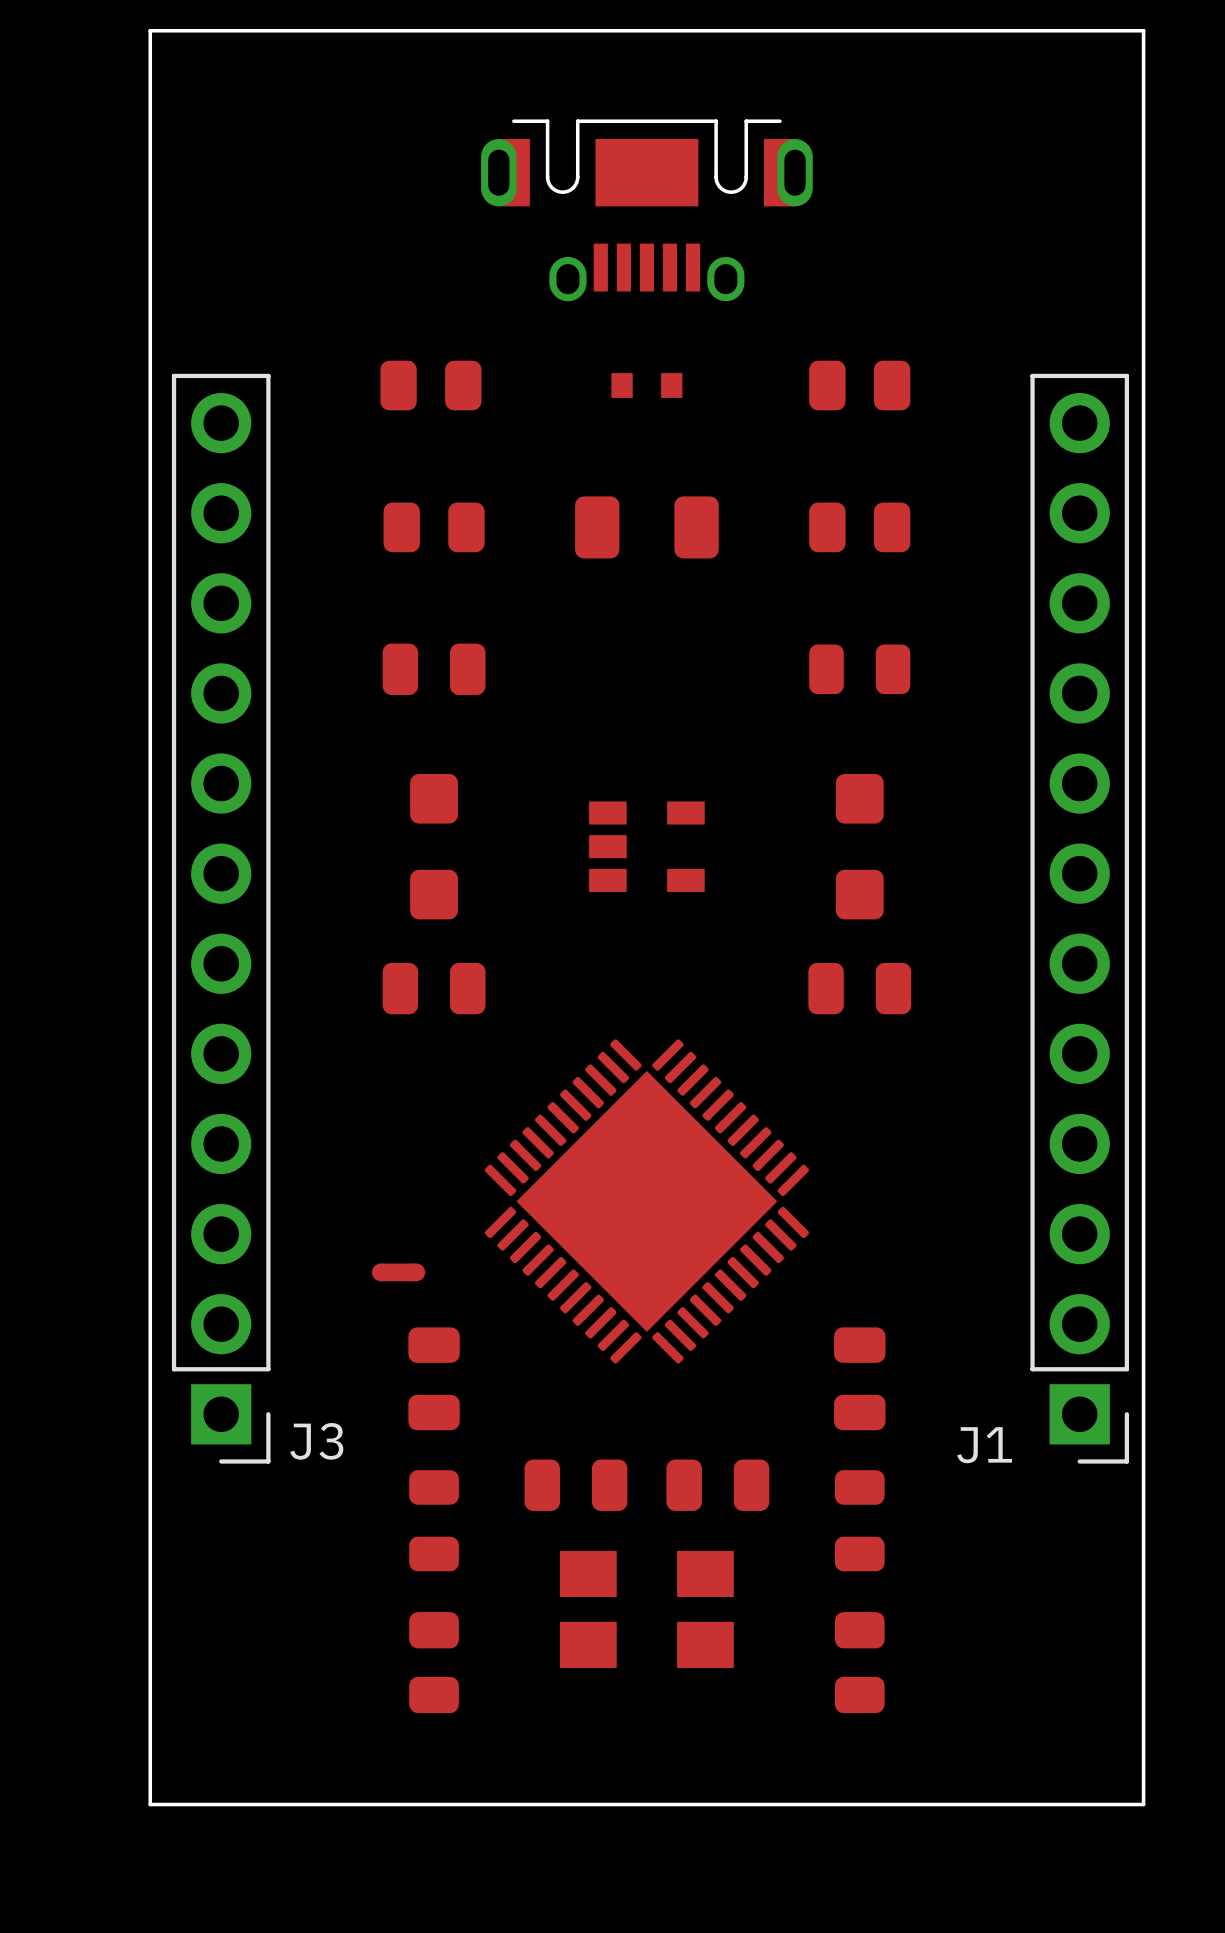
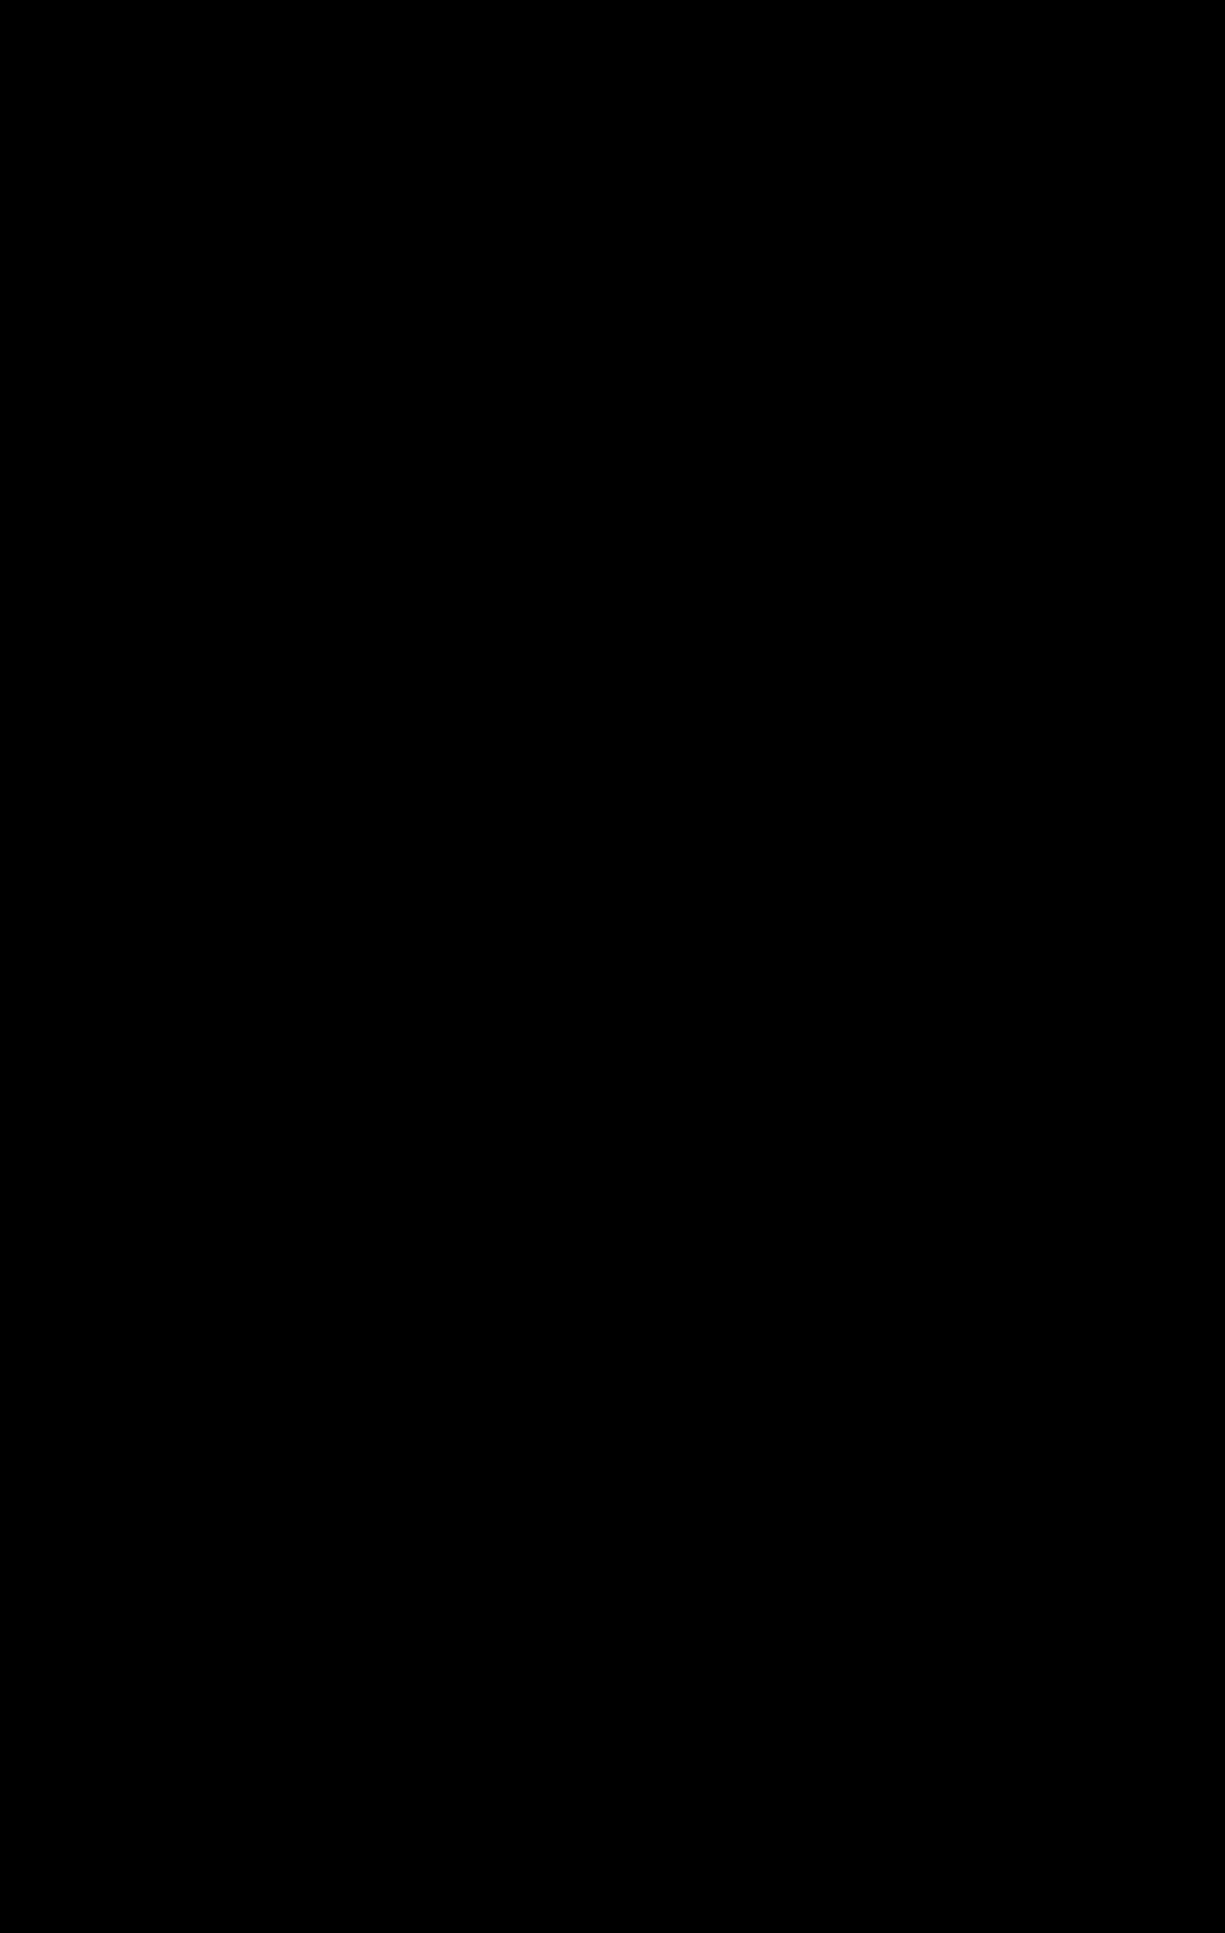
board edge: (1143, 30) (150, 30) (150, 1804) (1143, 1804) (1143, 30) -> none
part: (646, 210) -> none
part: (430, 385) -> none
part: (646, 385) -> none
part: (859, 385) -> none
part: (434, 527) -> none
part: (646, 527) -> none
part: (859, 527) -> none
part: (434, 669) -> none
part: (859, 669) -> none
part: (434, 846) -> none
part: (646, 846) -> none
part: (859, 846) -> none
J3: (221, 918) -> none
J1: (1079, 918) -> none
part: (434, 988) -> none
part: (859, 988) -> none
part: (646, 1201) -> none
part: (398, 1272) -> none
part: (434, 1378) -> none
part: (859, 1378) -> none
part: (575, 1485) -> none
part: (717, 1485) -> none
part: (434, 1520) -> none
part: (859, 1520) -> none
part: (646, 1609) -> none
part: (434, 1662) -> none
part: (859, 1662) -> none

